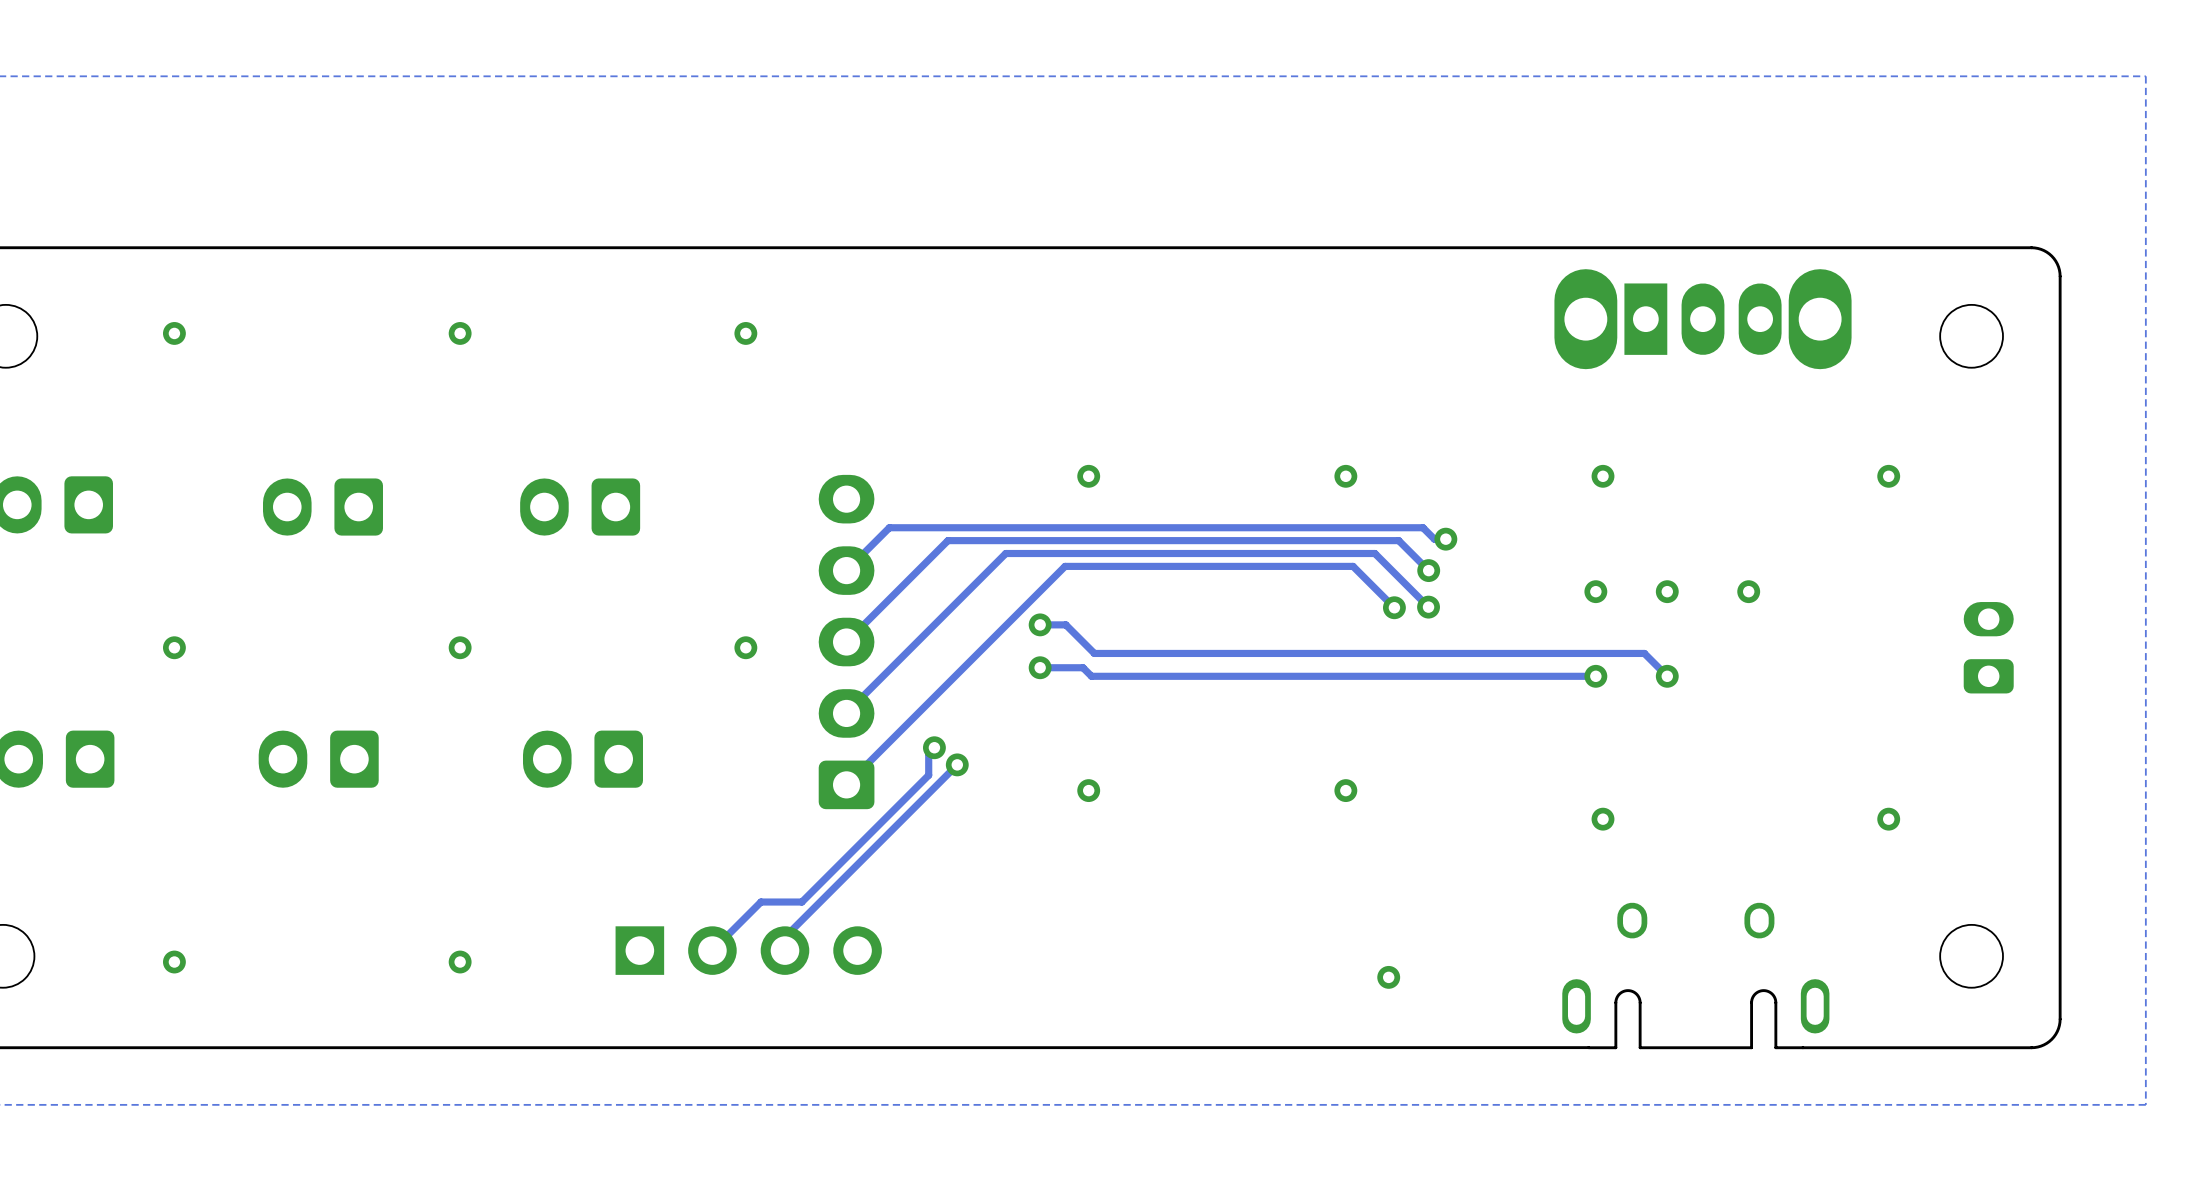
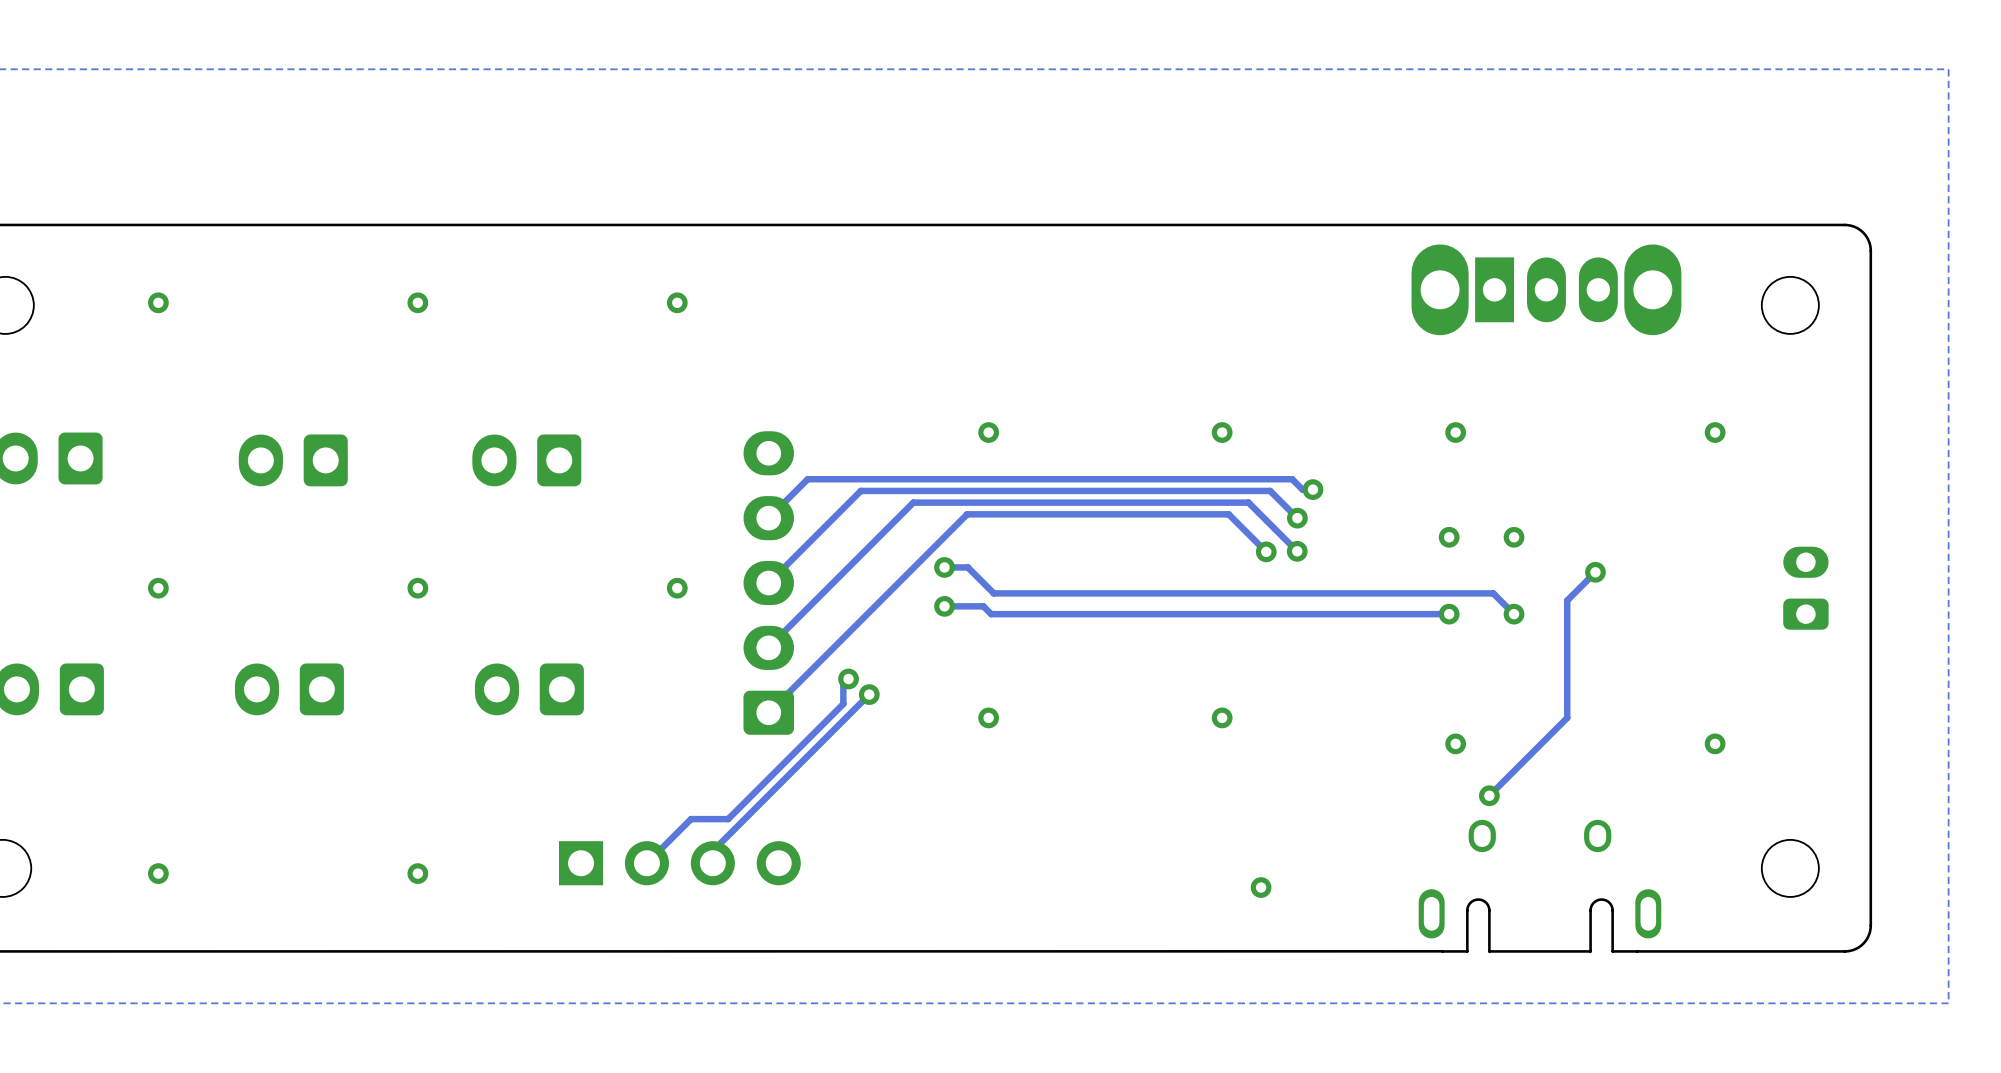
via position: (1748, 591) -> (1595, 572)
track: none -> (1595, 572) (1567, 600) (1567, 717) (1489, 795)
via: none -> (1489, 795)

